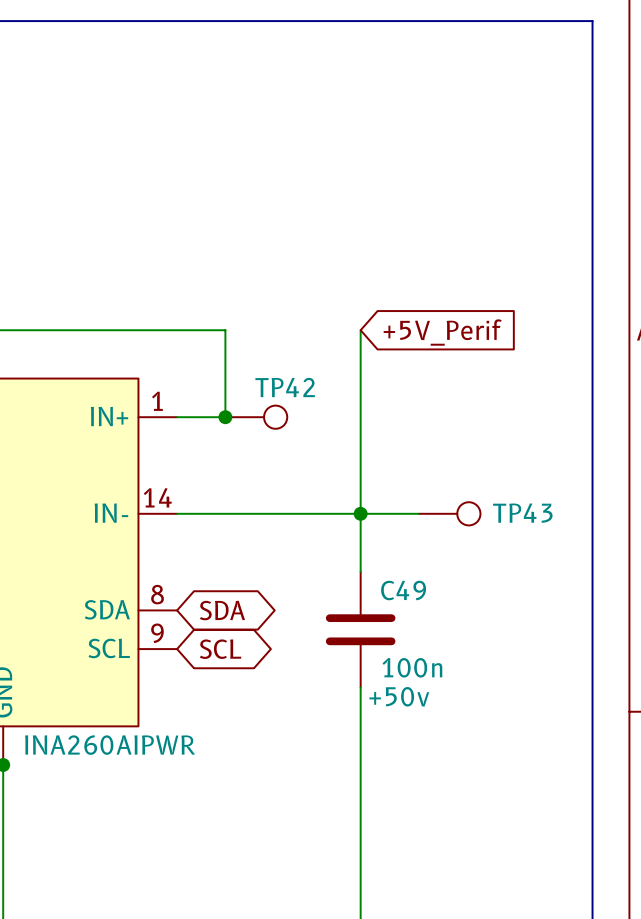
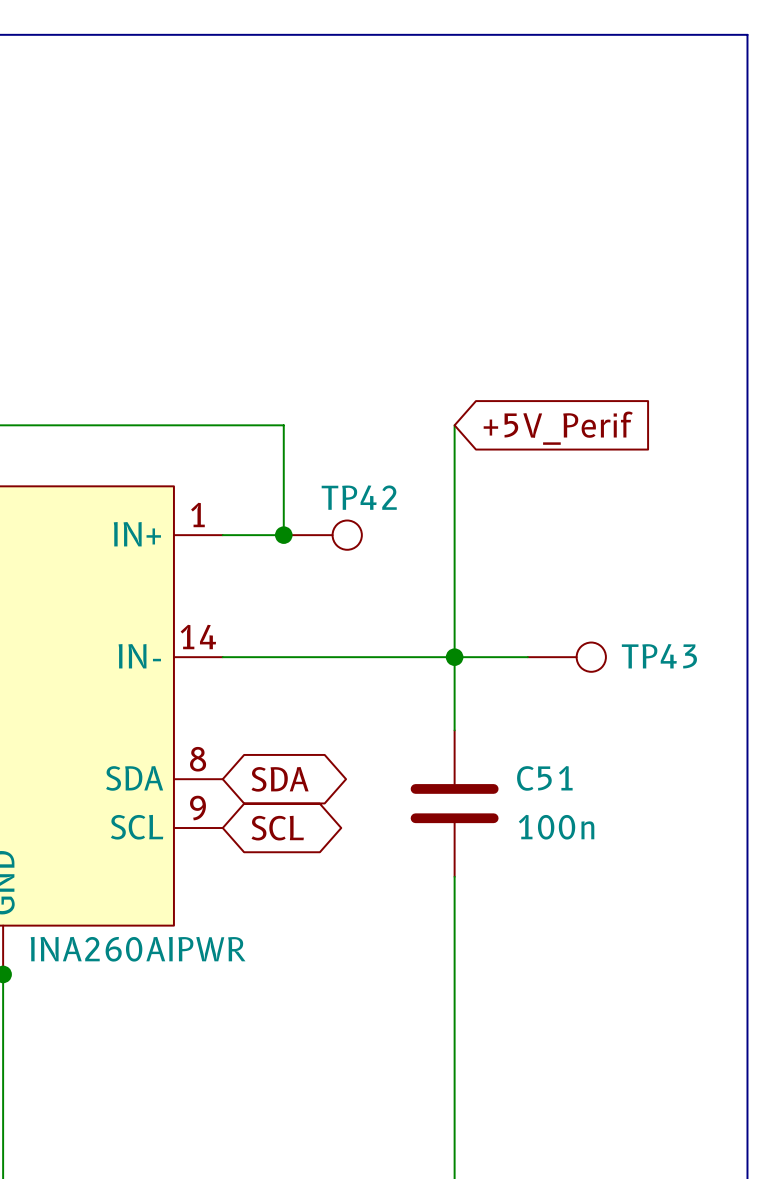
C49 name: C49 (403, 590) -> C51 (544, 778)
C49 value position: 100n (412, 667) -> 100n (556, 827)
C49 text: +50v (399, 696) -> none

